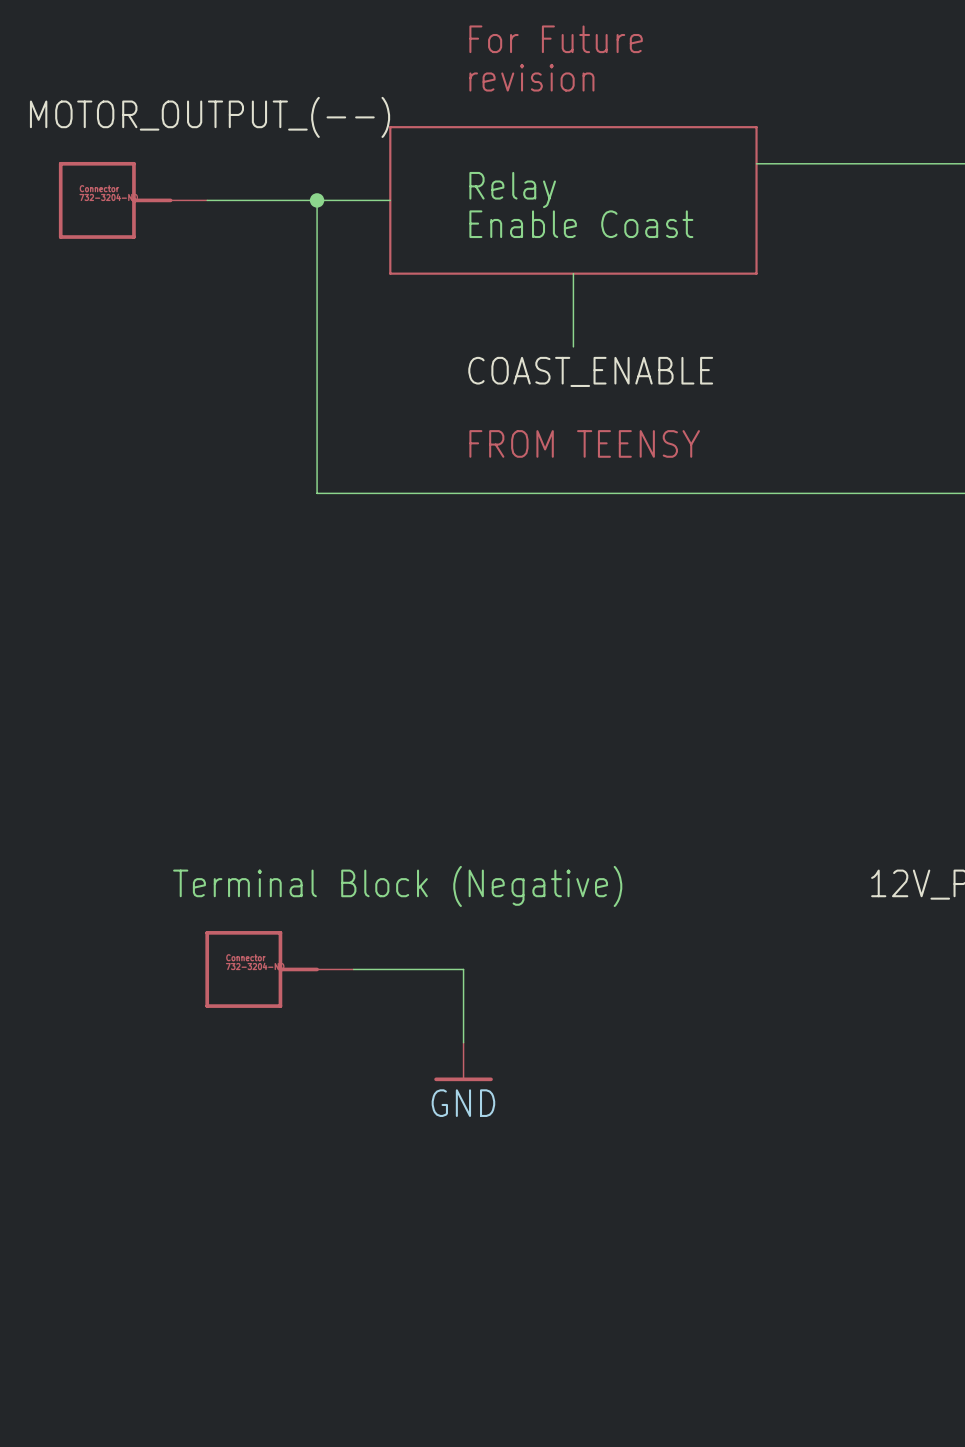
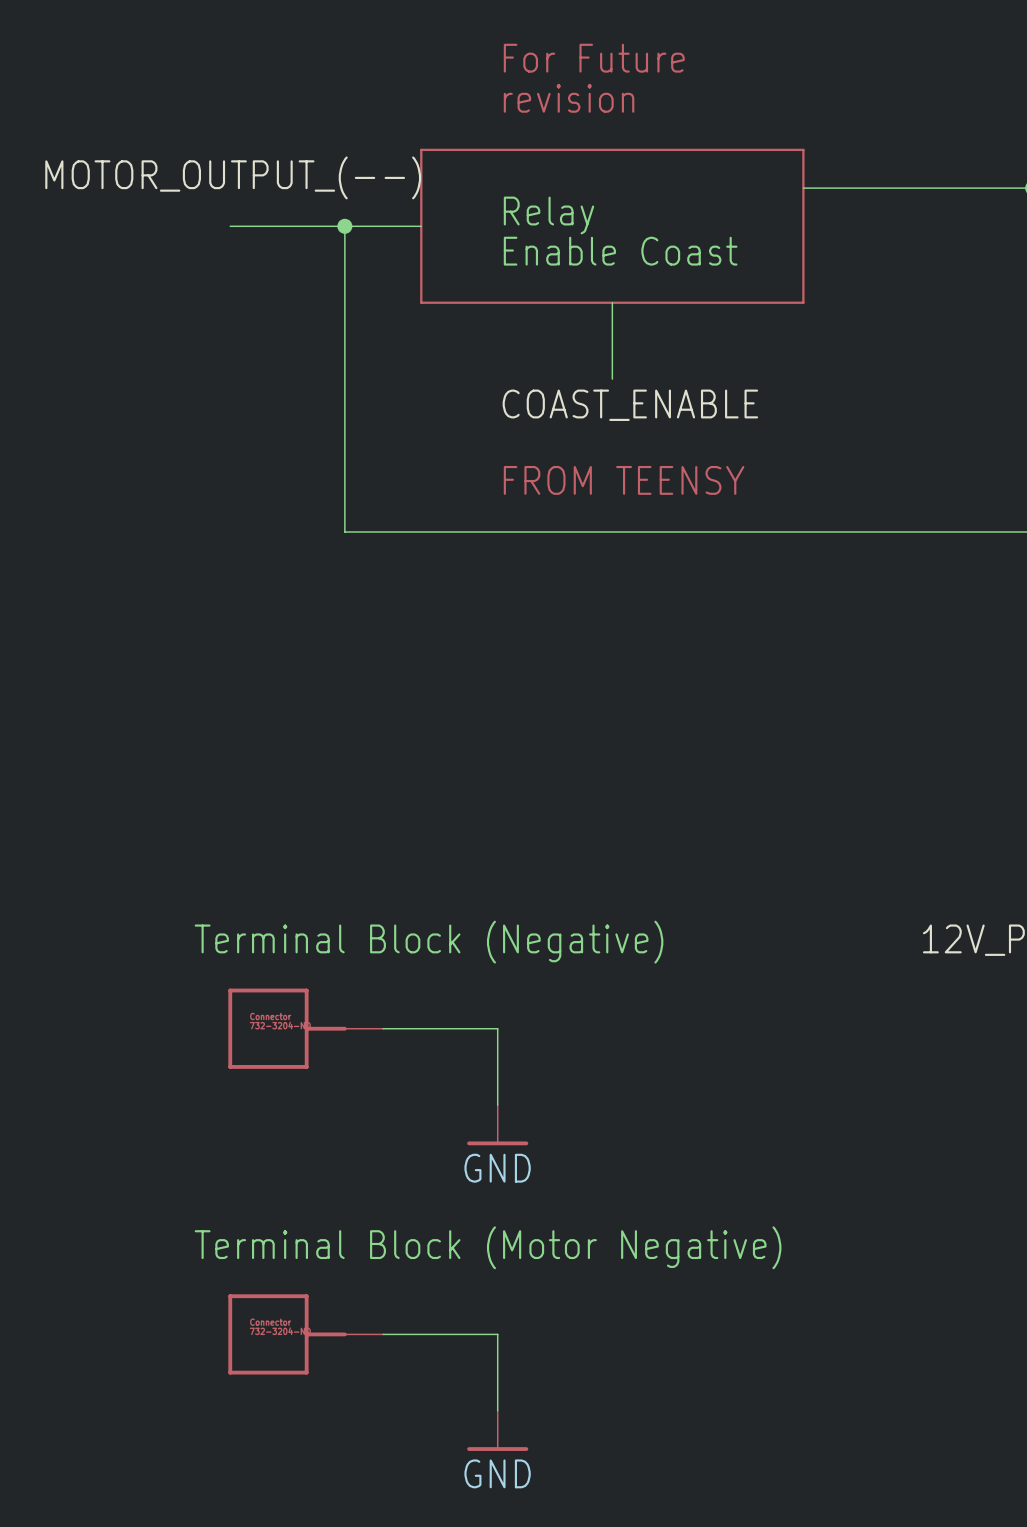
label position: MOTOR_OUTPUT_(--) (210, 117) -> MOTOR_OUTPUT_(--) (233, 177)
part: (133, 200) -> none
text: none -> Terminal Block (Motor Negative) (488, 1247)
part: none -> (305, 1334)
wire: none -> (383, 1334) (497, 1334) (497, 1410)
power symbol: none -> GND (497, 1430)

